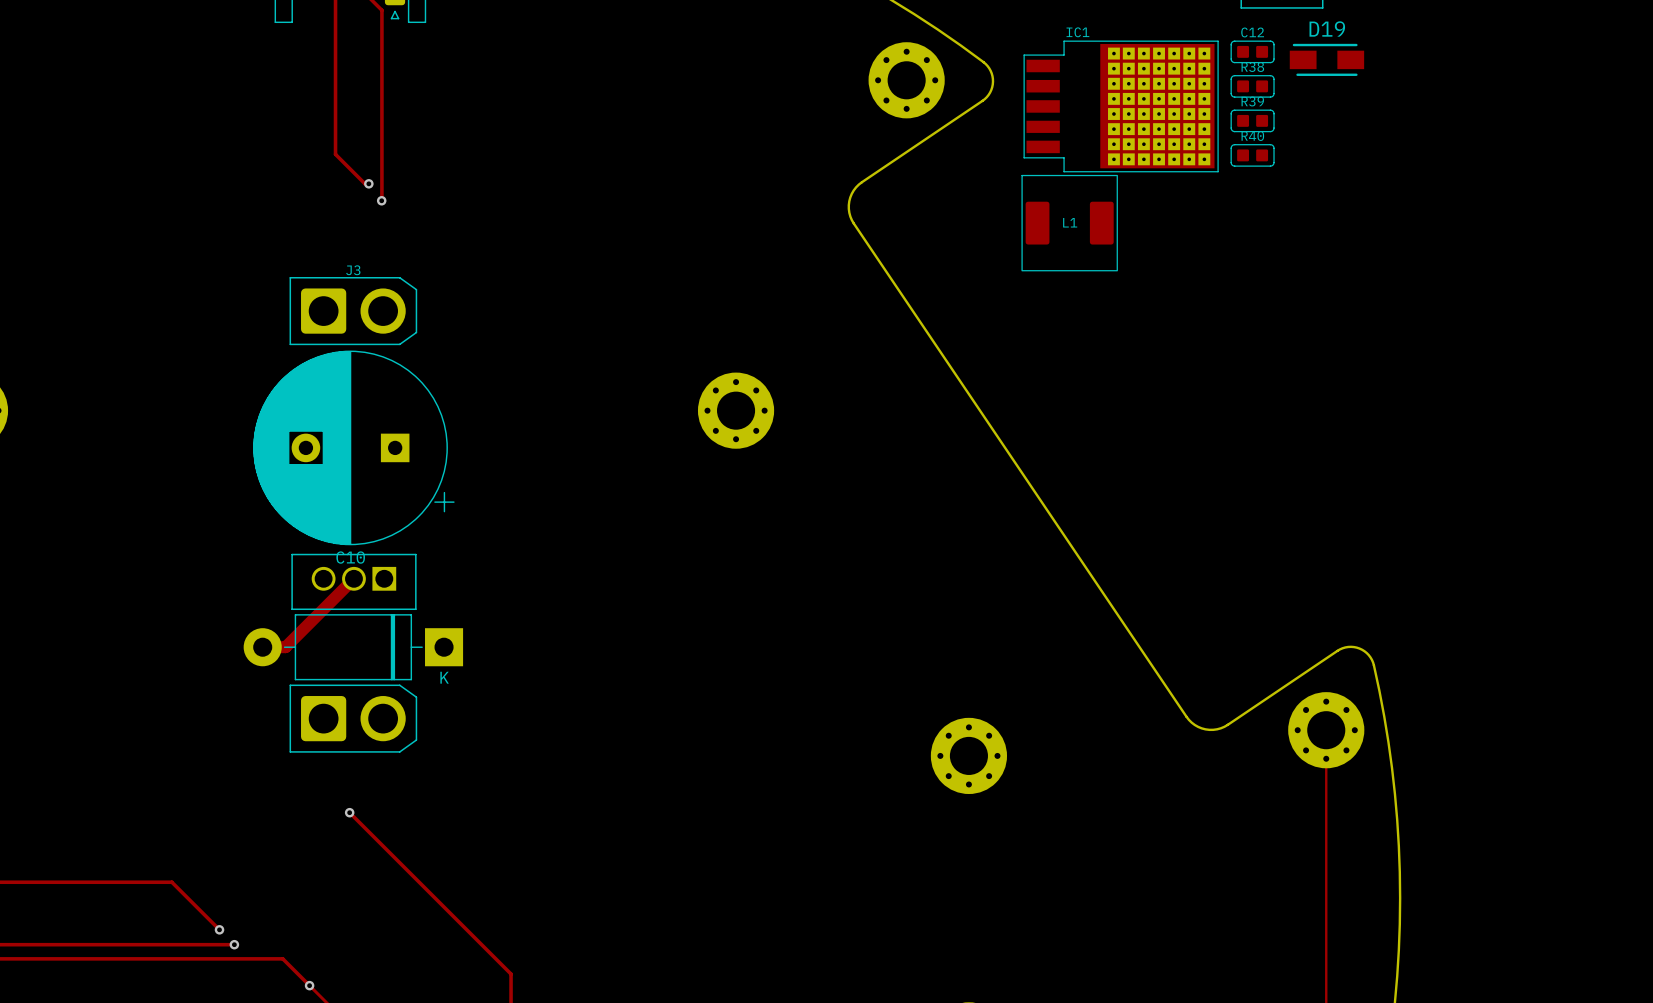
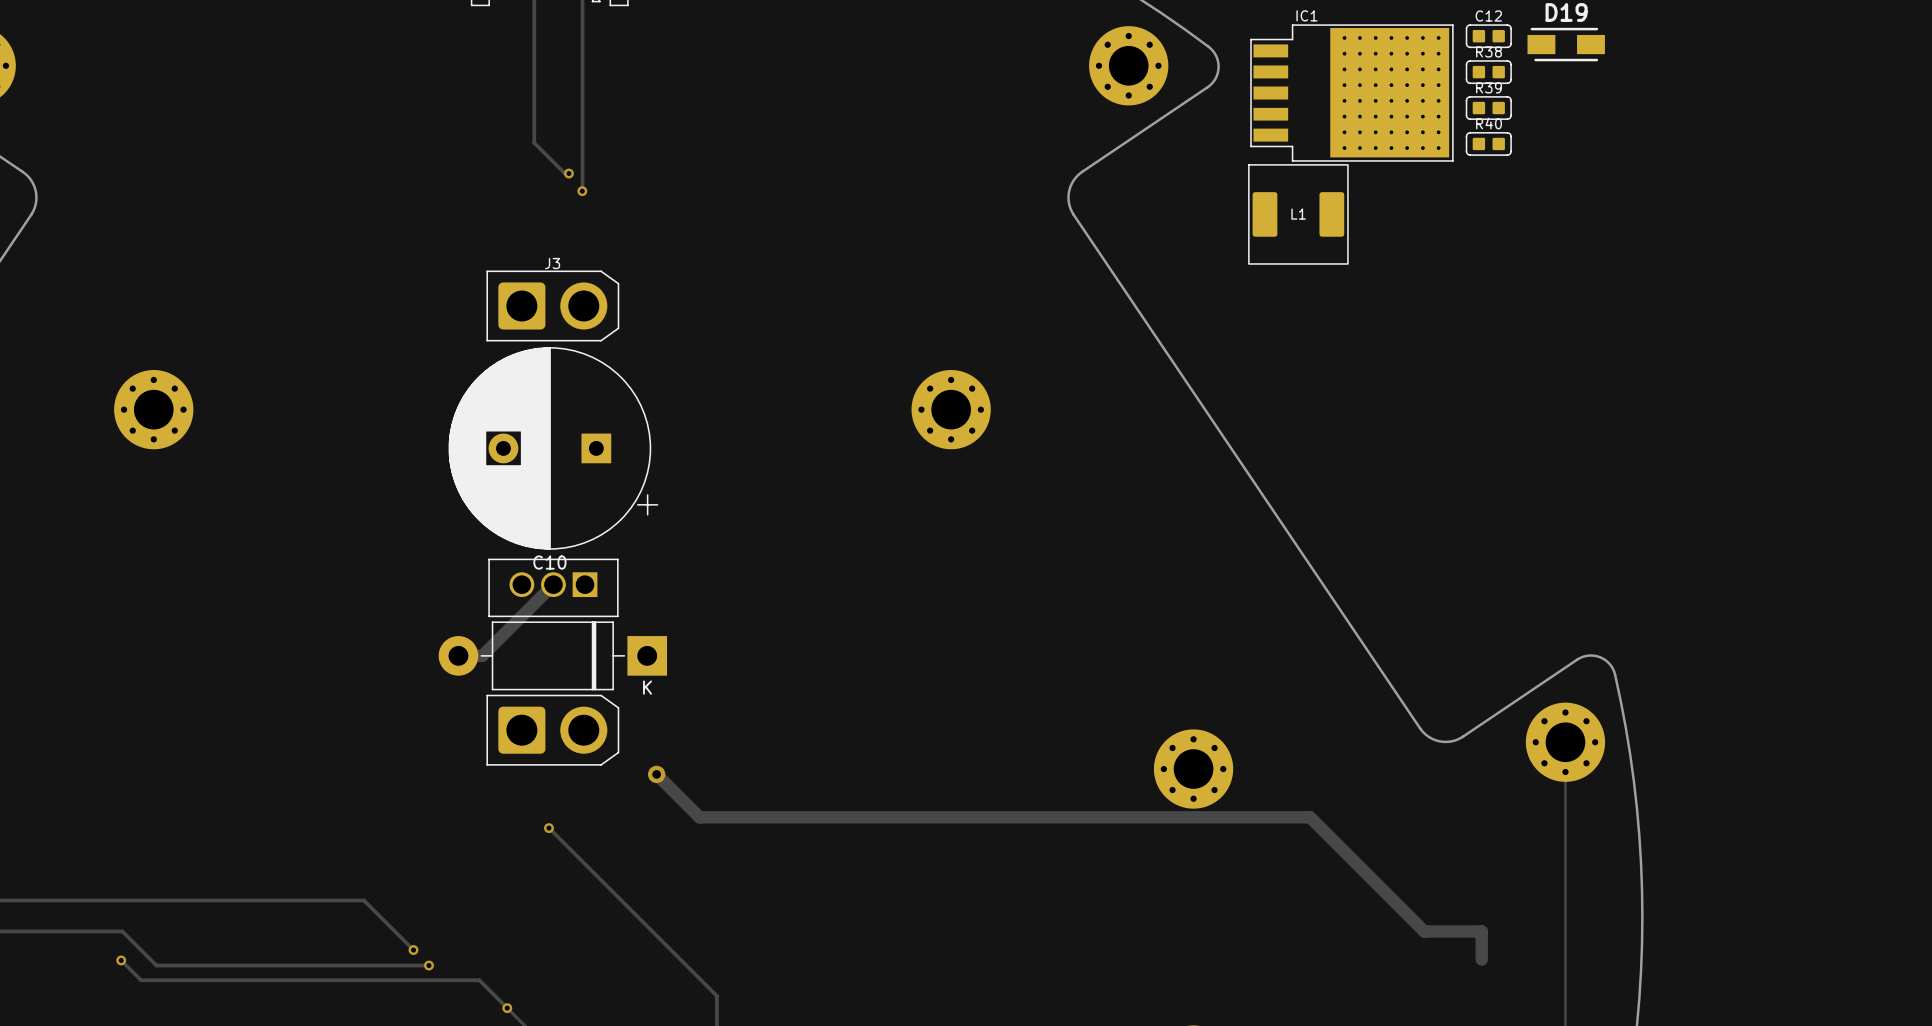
track: none -> (656, 774) (699, 817) (1310, 817) (1424, 931) (1481, 931) (1481, 959)
via: none -> (656, 774)

